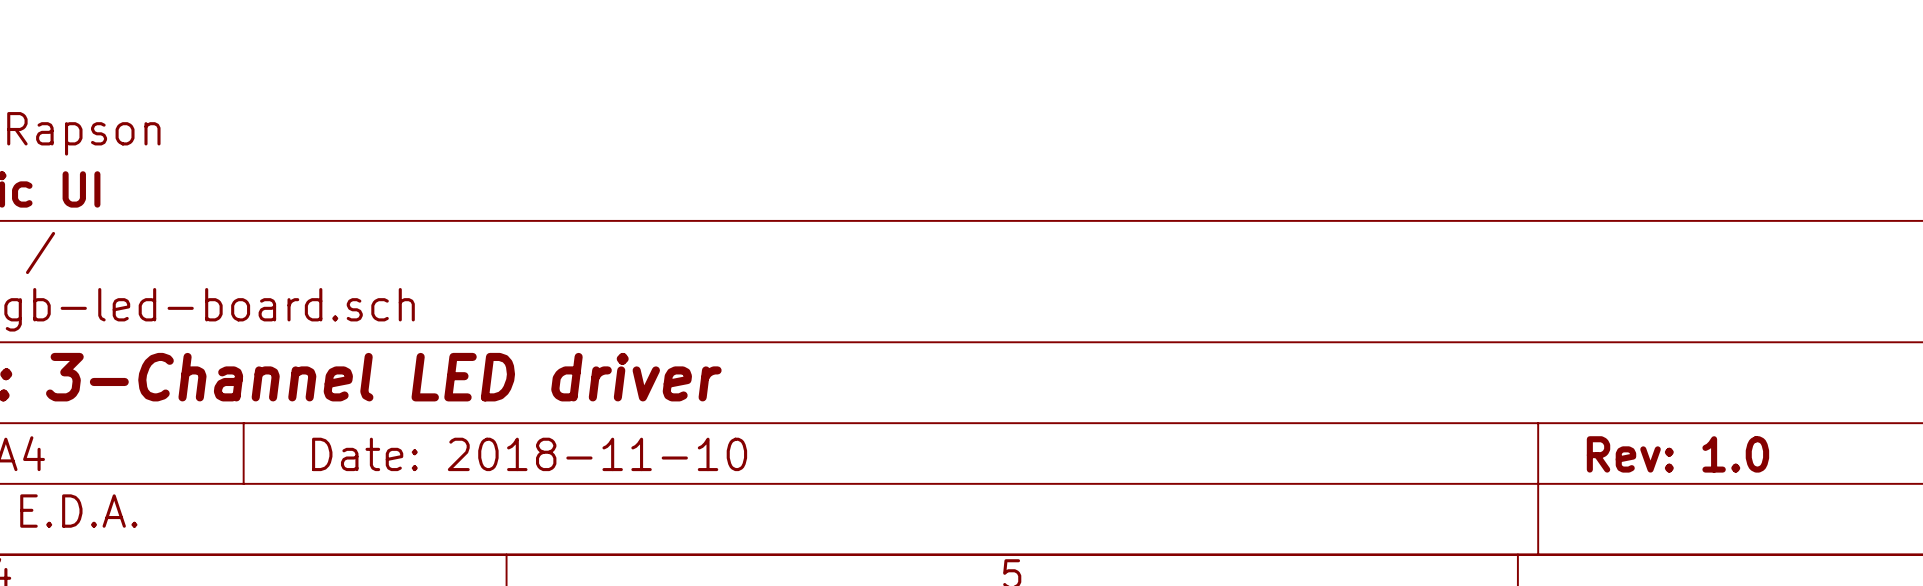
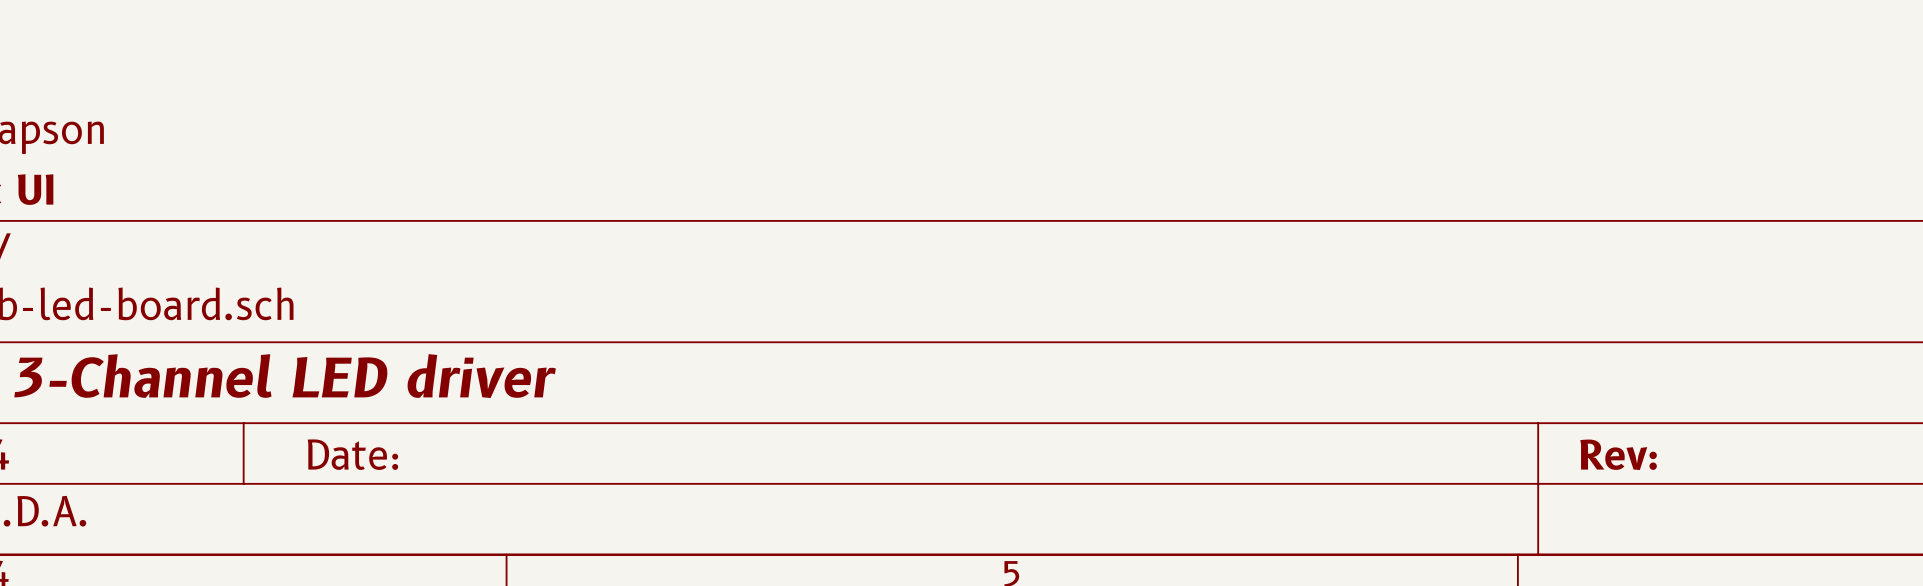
title block: Date: 2018-11-10 (529, 454) -> Date: (352, 454)
title block: Rev: 1.0 (1677, 454) -> Rev: (1618, 454)

